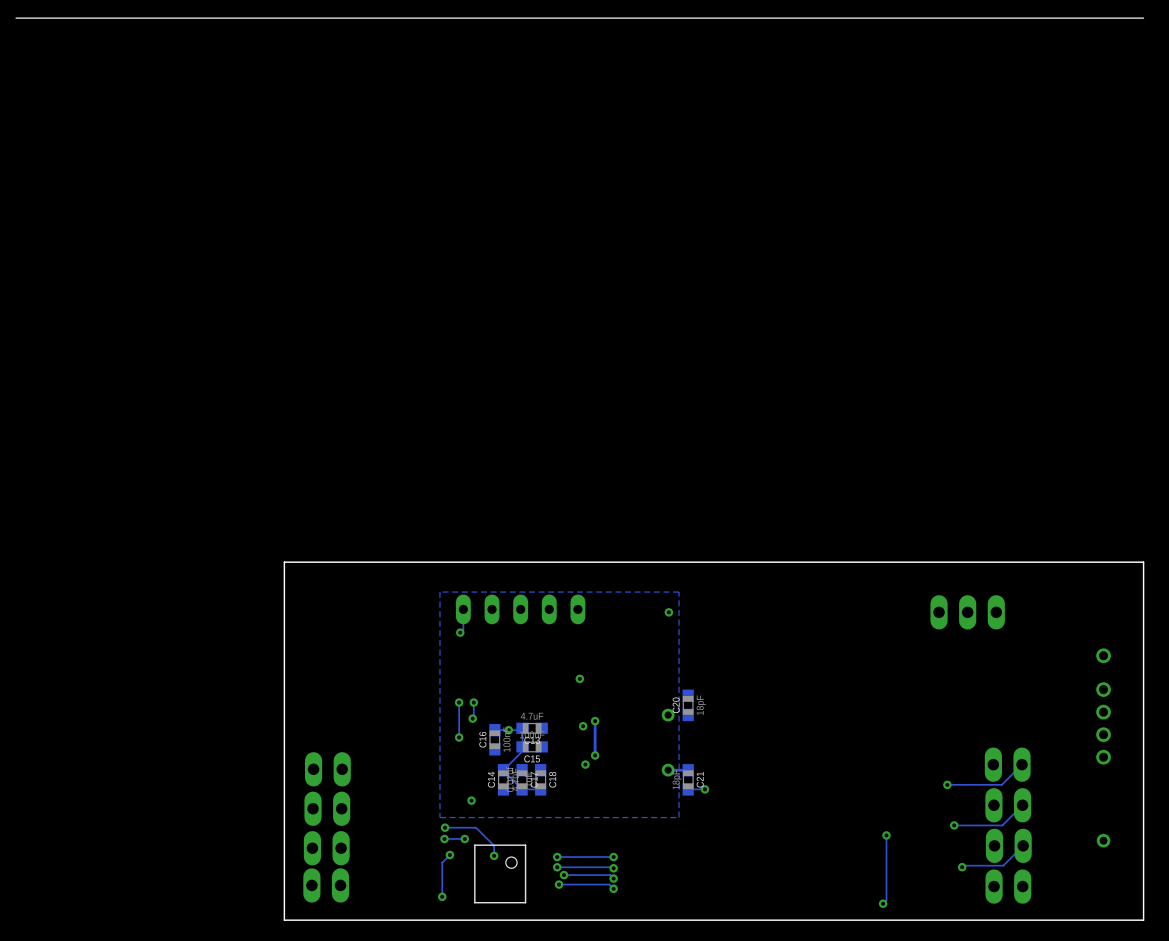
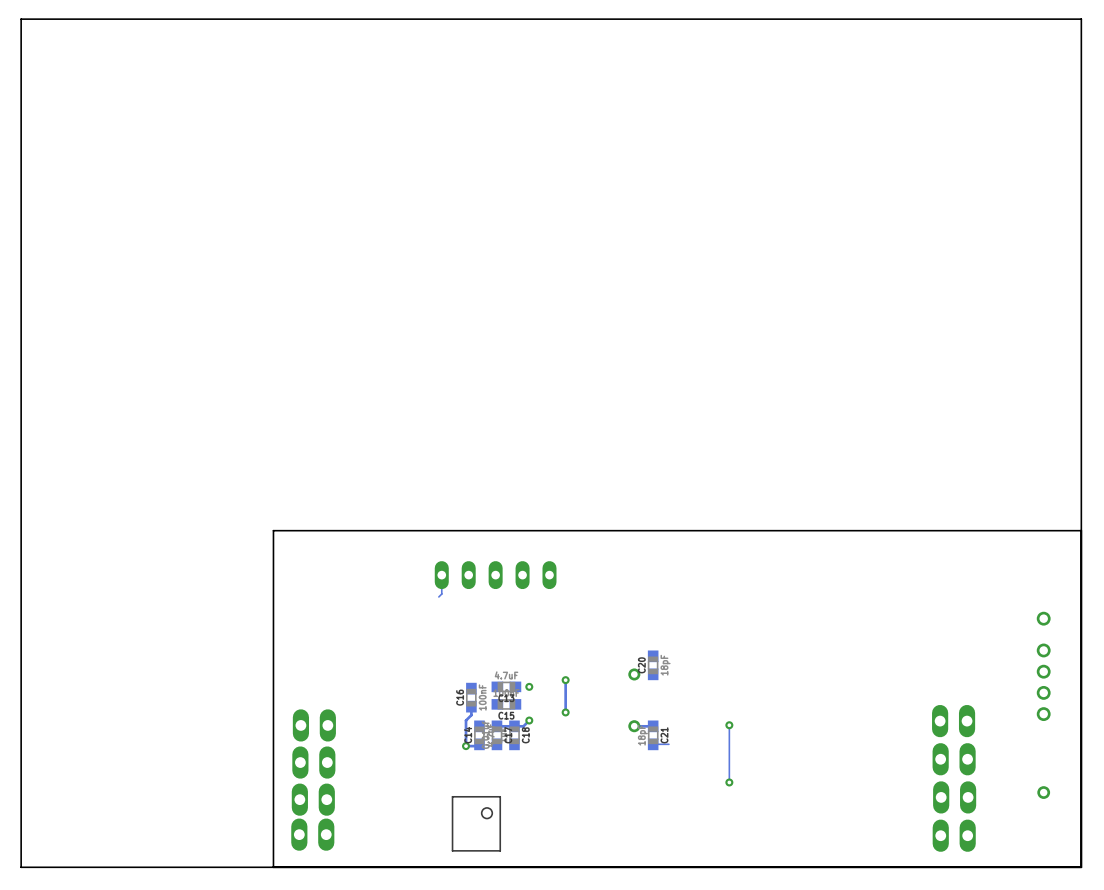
board edge: none -> (1081, 19) (1081, 867) (21, 867) (21, 19)
zone outline: (679, 592) (439, 592) (439, 817) (679, 817) (679, 592) -> none
via: (668, 612) -> none
part: (967, 612) -> none
via: (460, 632) -> none
via: (579, 678) -> none
track: (459, 702) (459, 737) -> none
via: (459, 702) -> none
track: (473, 702) (472, 718) -> none
via: (473, 702) -> none
via: (472, 718) -> none
via: (583, 726) -> none
via: none -> (529, 686)
track: (494, 730) (520, 730) (522, 728) (522, 751) (503, 770) (522, 789) (540, 789) -> none
via: (508, 730) -> none
via: (459, 737) -> none
track: none -> (471, 706) (471, 715) (466, 720) (466, 746) (477, 746) (479, 744)
track: none -> (529, 720) (523, 726) (496, 726)
via: none -> (529, 720)
via: (585, 764) -> none
track: (1022, 764) (1001, 784) (947, 784) -> none
track: none -> (729, 725) (729, 782)
via: none -> (729, 725)
via: (947, 784) -> none
via: (704, 789) -> none
via position: (471, 800) -> (466, 746)
track: (1022, 805) (1002, 825) (954, 825) -> none
via: (954, 825) -> none
track: (445, 827) (476, 827) (494, 845) (494, 855) -> none
via: (445, 827) -> none
via: none -> (729, 782)
track: (886, 835) (886, 900) (883, 903) -> none
via: (886, 835) -> none
via: (444, 838) -> none
track: (464, 838) (444, 838) -> none
via: (464, 838) -> none
track: (1023, 845) (1003, 865) (962, 867) -> none
track: (449, 855) (442, 862) (442, 896) -> none
via: (449, 855) -> none
via: (494, 855) -> none
via: (557, 857) -> none
track: (613, 857) (557, 857) -> none
via: (613, 857) -> none
track: (557, 867) (613, 868) -> none
via: (557, 867) -> none
via: (962, 867) -> none
via: (613, 868) -> none
track: (564, 875) (610, 875) (613, 878) -> none
via: (564, 875) -> none
via: (613, 878) -> none
track: (559, 884) (609, 884) (613, 888) -> none
via: (559, 884) -> none
via: (613, 888) -> none
via: (442, 896) -> none
via: (883, 903) -> none

